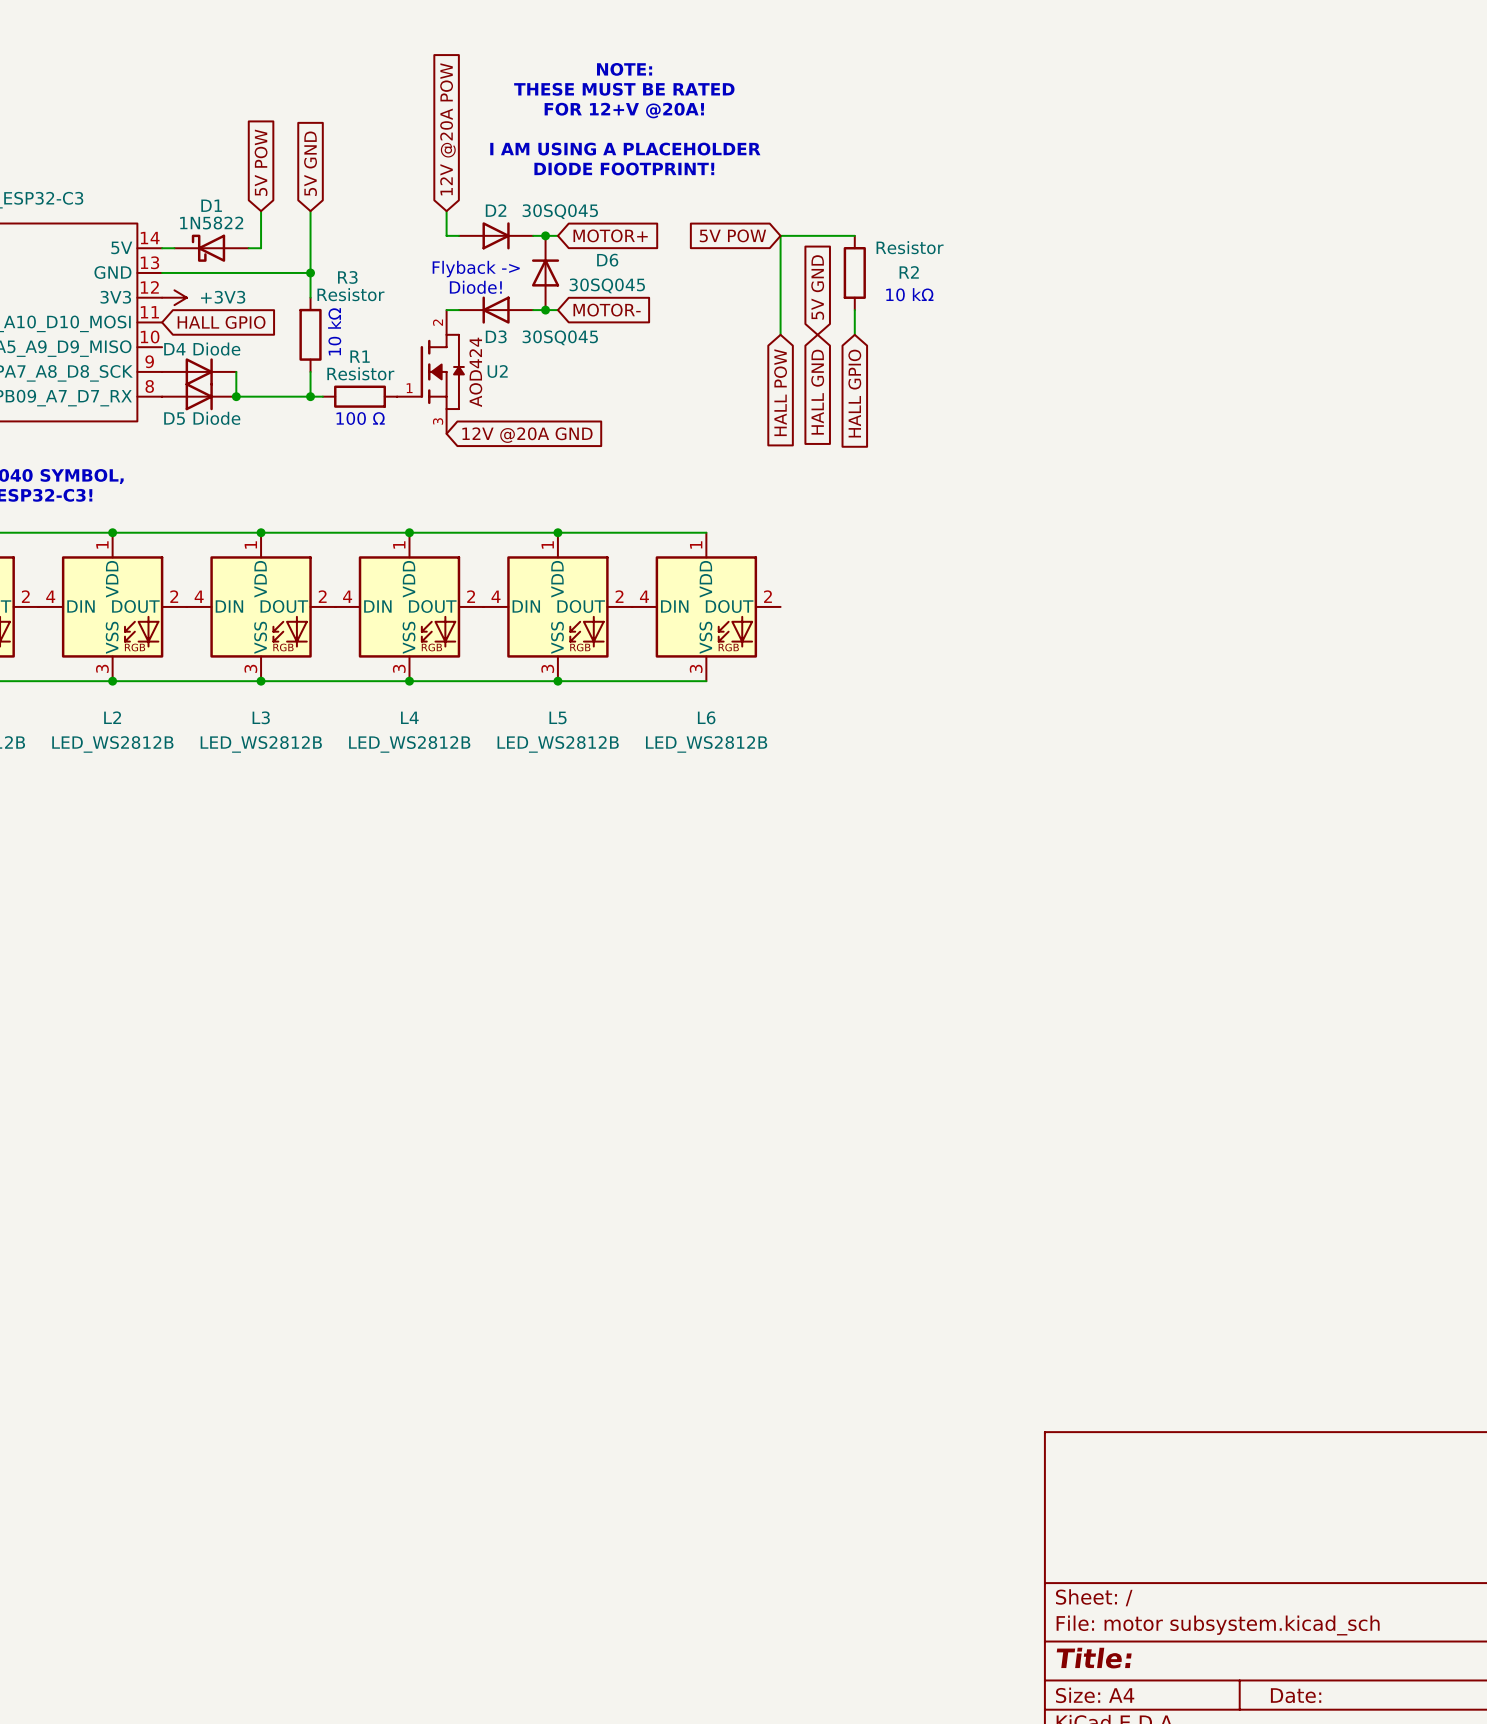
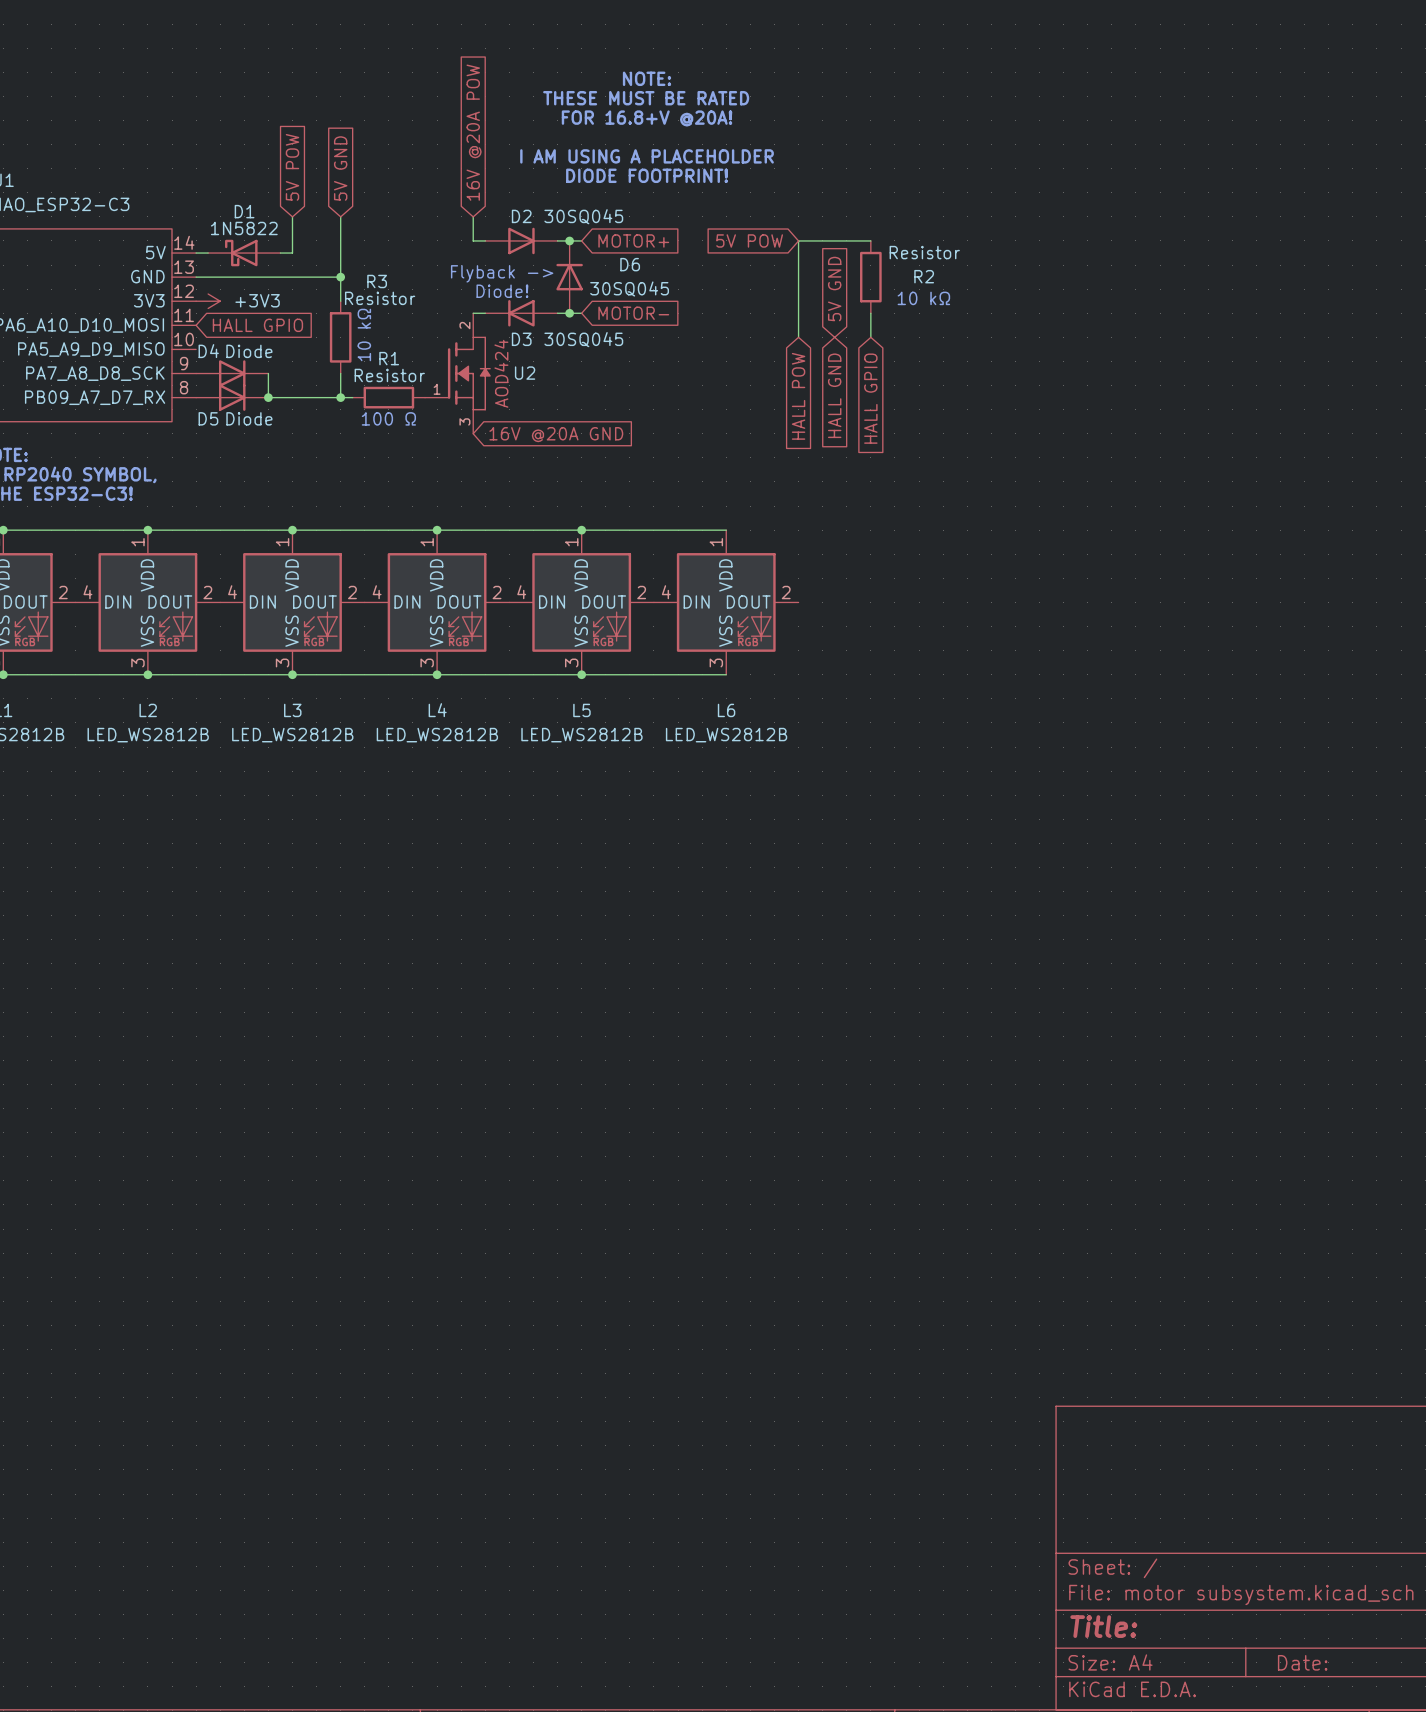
text: FOR 12+V @20A! (624, 110) -> FOR 16.8+V @20A! (647, 118)
global label: 12V @20A POW (447, 129) -> 16V @20A POW (474, 132)
global label: 12V @20A GND (527, 435) -> 16V @20A GND (556, 434)

